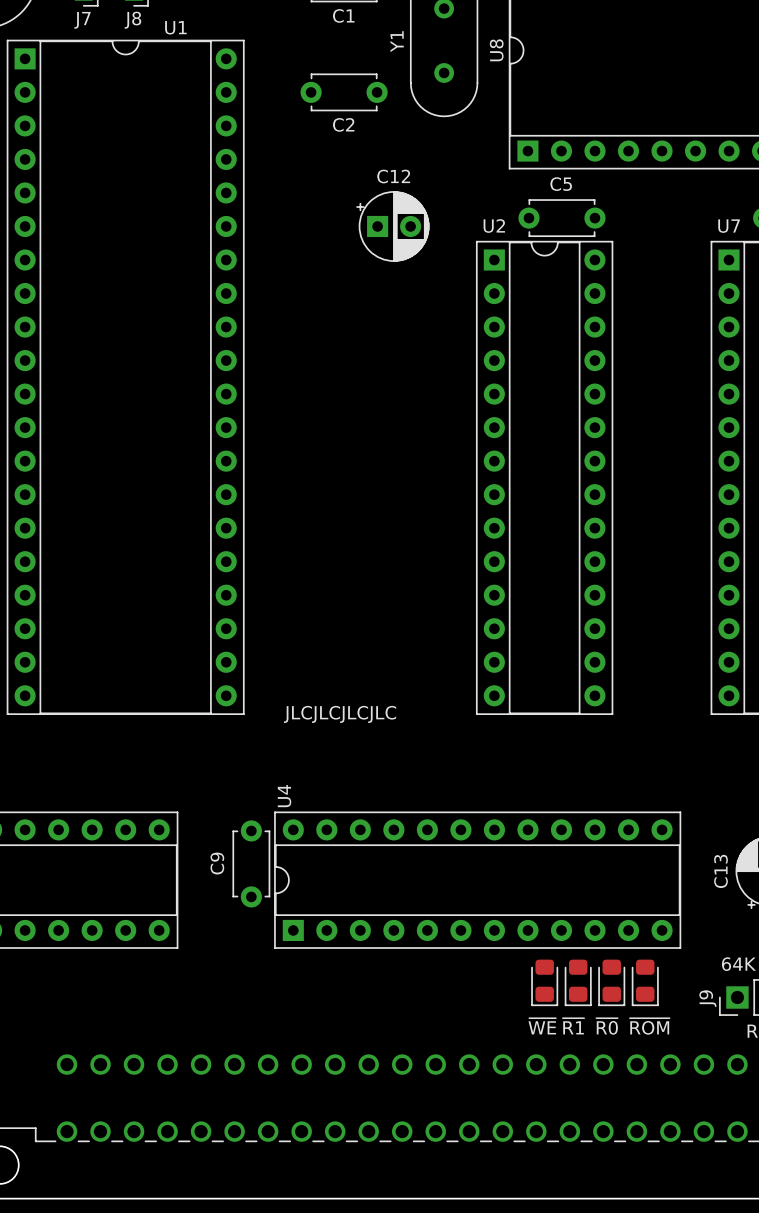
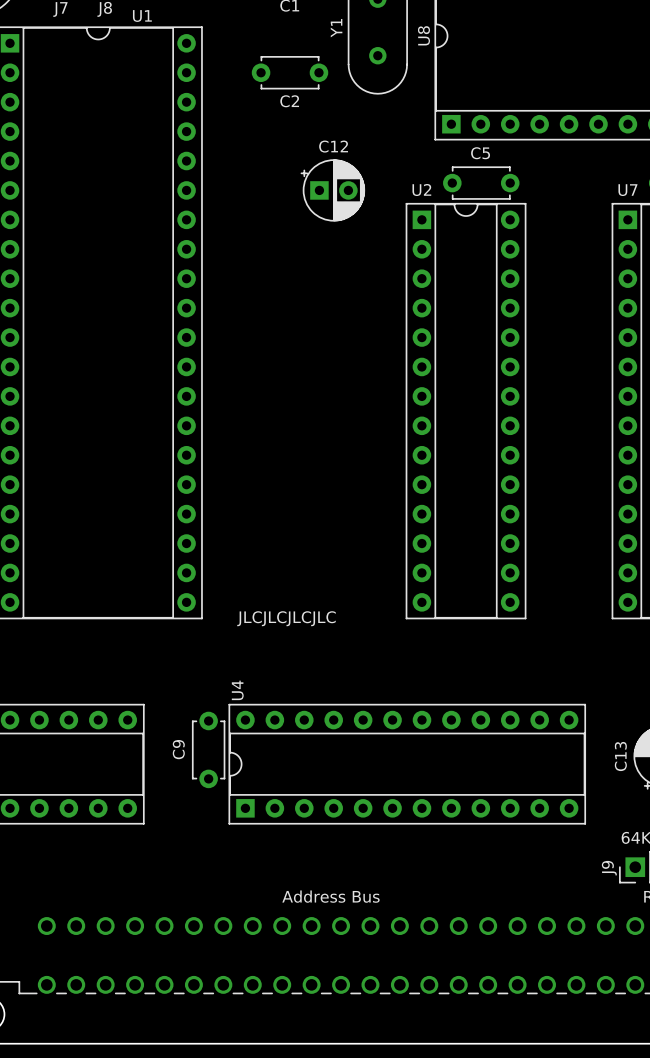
part: (544, 982) -> none
part: (578, 982) -> none
part: (611, 982) -> none
part: (645, 982) -> none
text: ~{WE} (542, 1026) -> none
text: ~{R1} (573, 1026) -> none
text: ~{R0} (607, 1026) -> none
text: ~{ROM} (649, 1026) -> none
text: none -> Address Bus (330, 896)

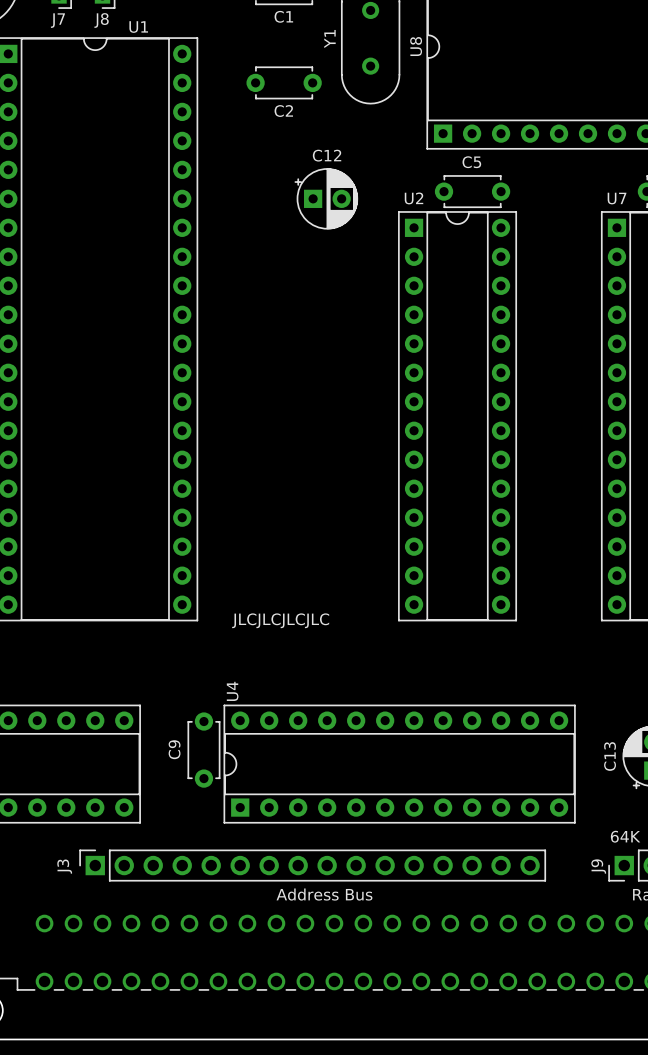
J3: none -> (312, 865)

